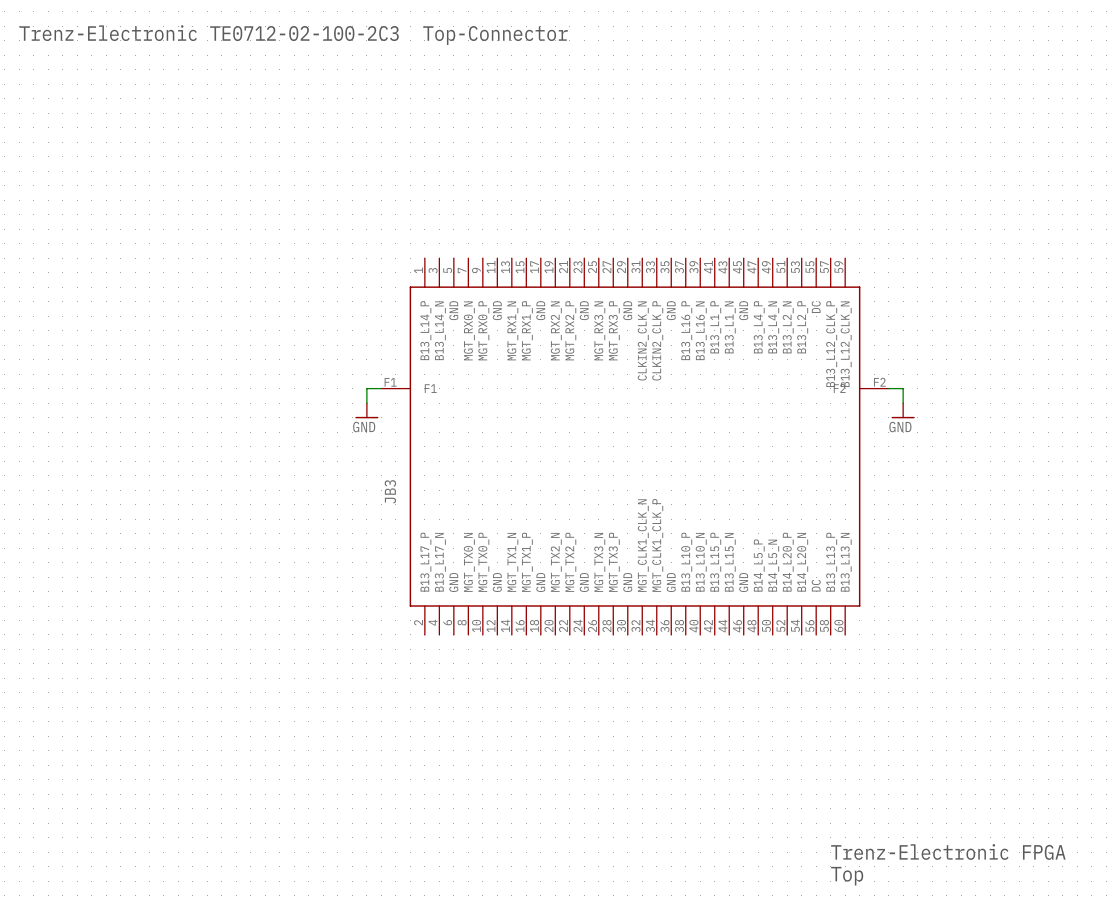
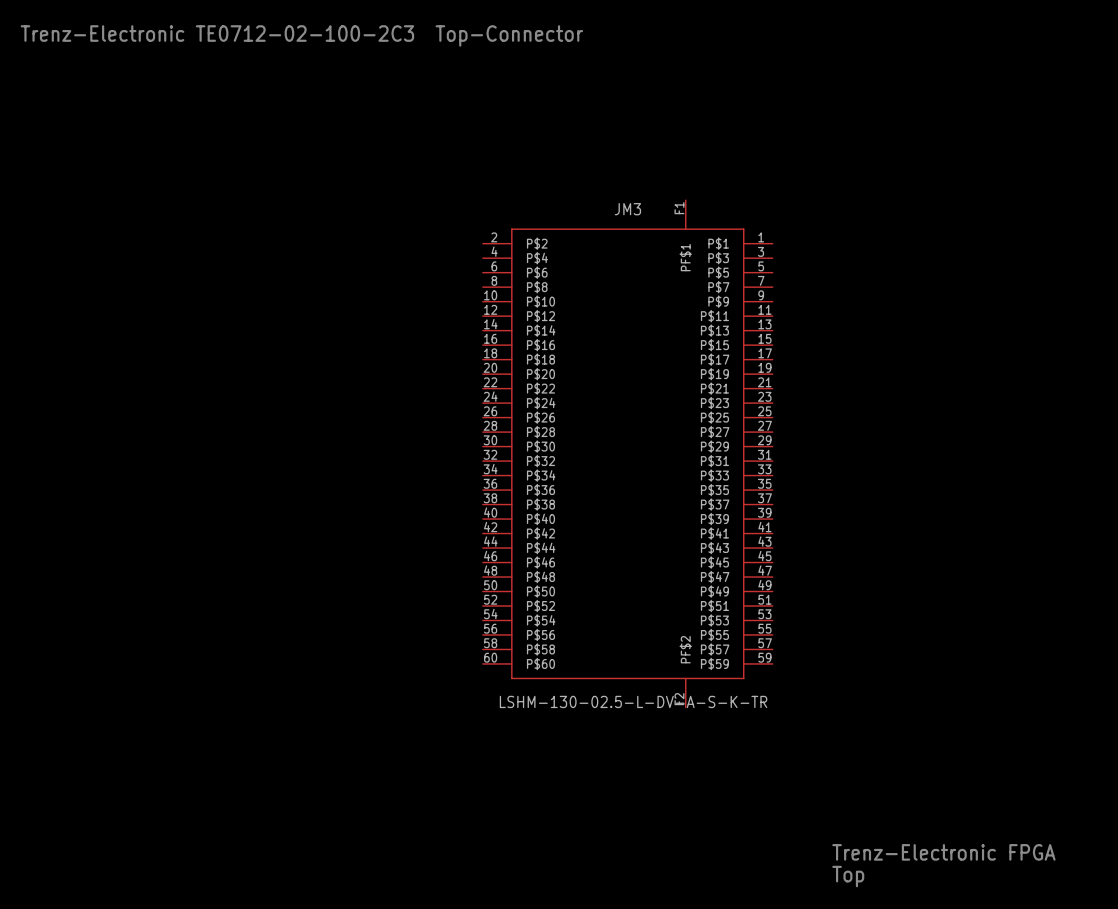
wire: (381, 388) (366, 388) (366, 403) -> none
wire: (888, 388) (903, 388) (903, 403) -> none
power symbol: GND (366, 410) -> none
power symbol: GND (903, 410) -> none
JB3: (635, 446) -> none
JM3: none -> LSHM-130-02.5-L-DV-A-S-K-TR (627, 453)

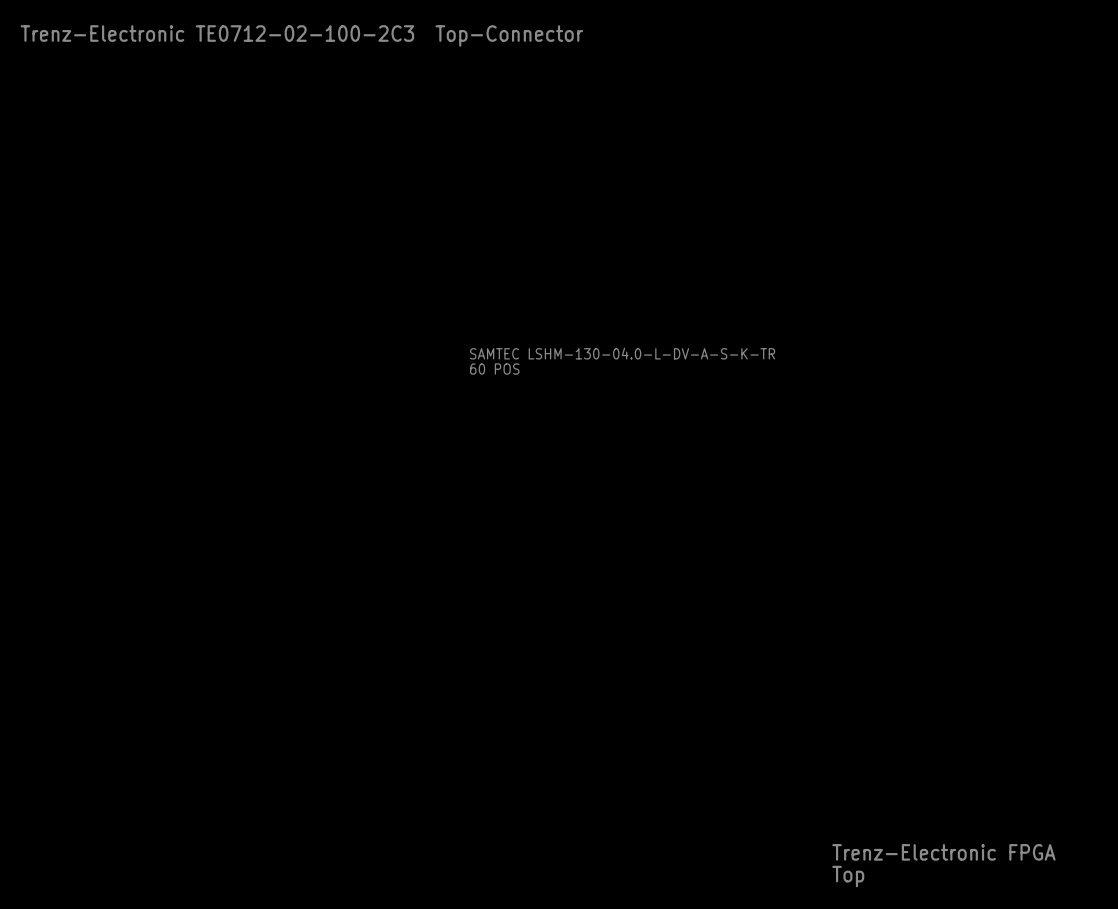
text: none -> SAMTEC LSHM-130-04.0-L-DV-A-S-K-TR (622, 353)
text: none -> 60 POS (494, 369)
JM3: LSHM-130-02.5-L-DV-A-S-K-TR (627, 453) -> none

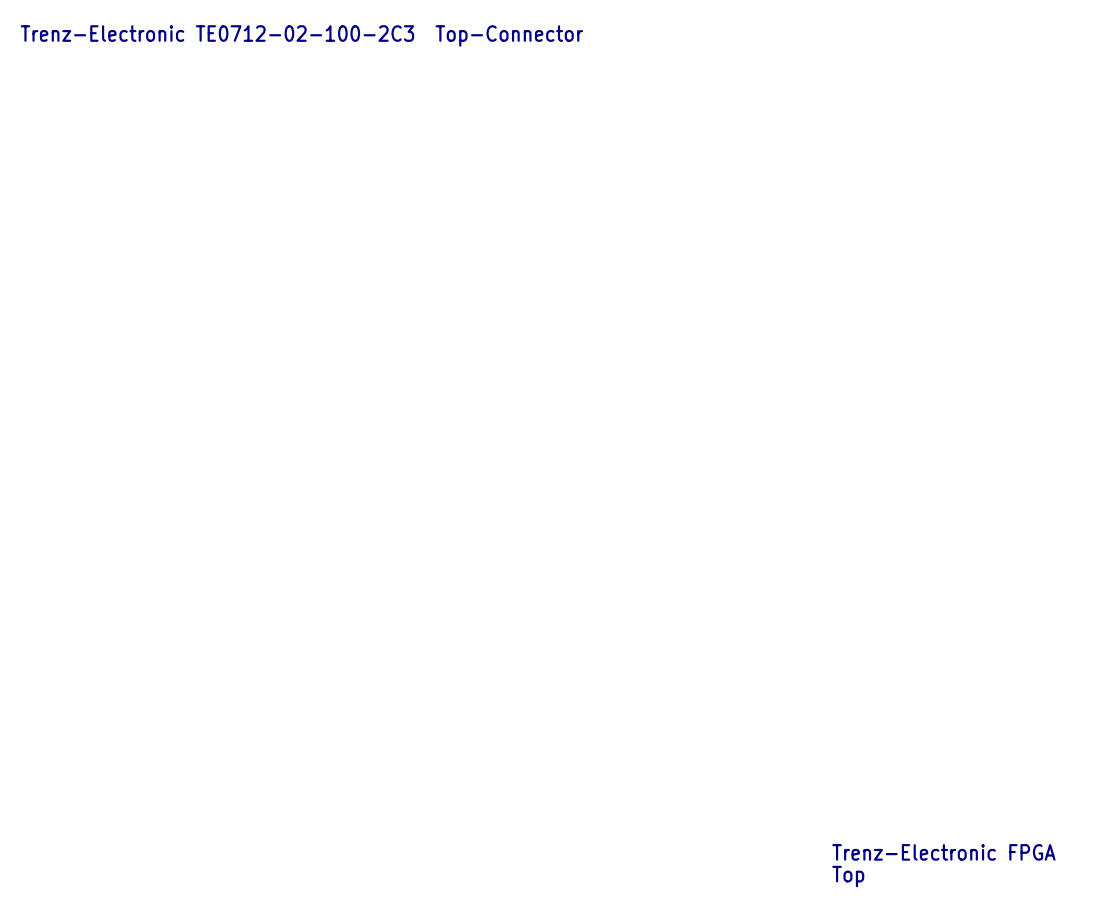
text: SAMTEC LSHM-130-04.0-L-DV-A-S-K-TR (622, 353) -> none
text: 60 POS (494, 369) -> none

